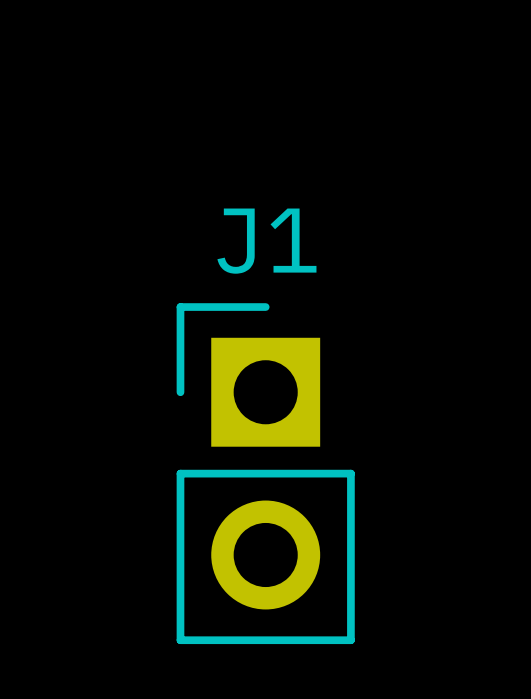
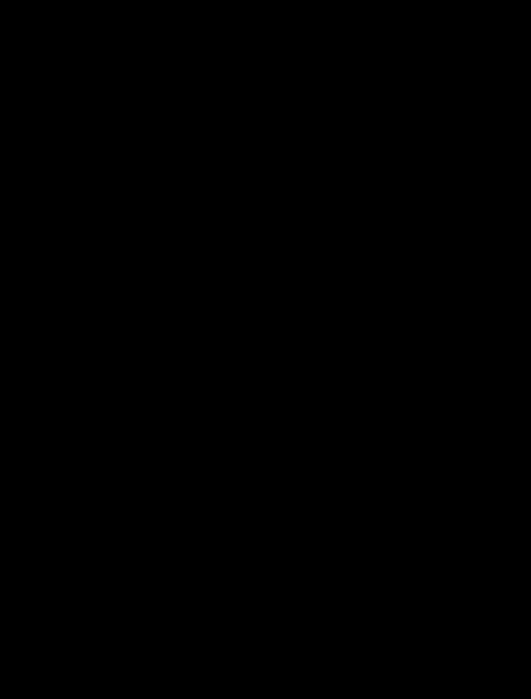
J1: (265, 473) -> none

